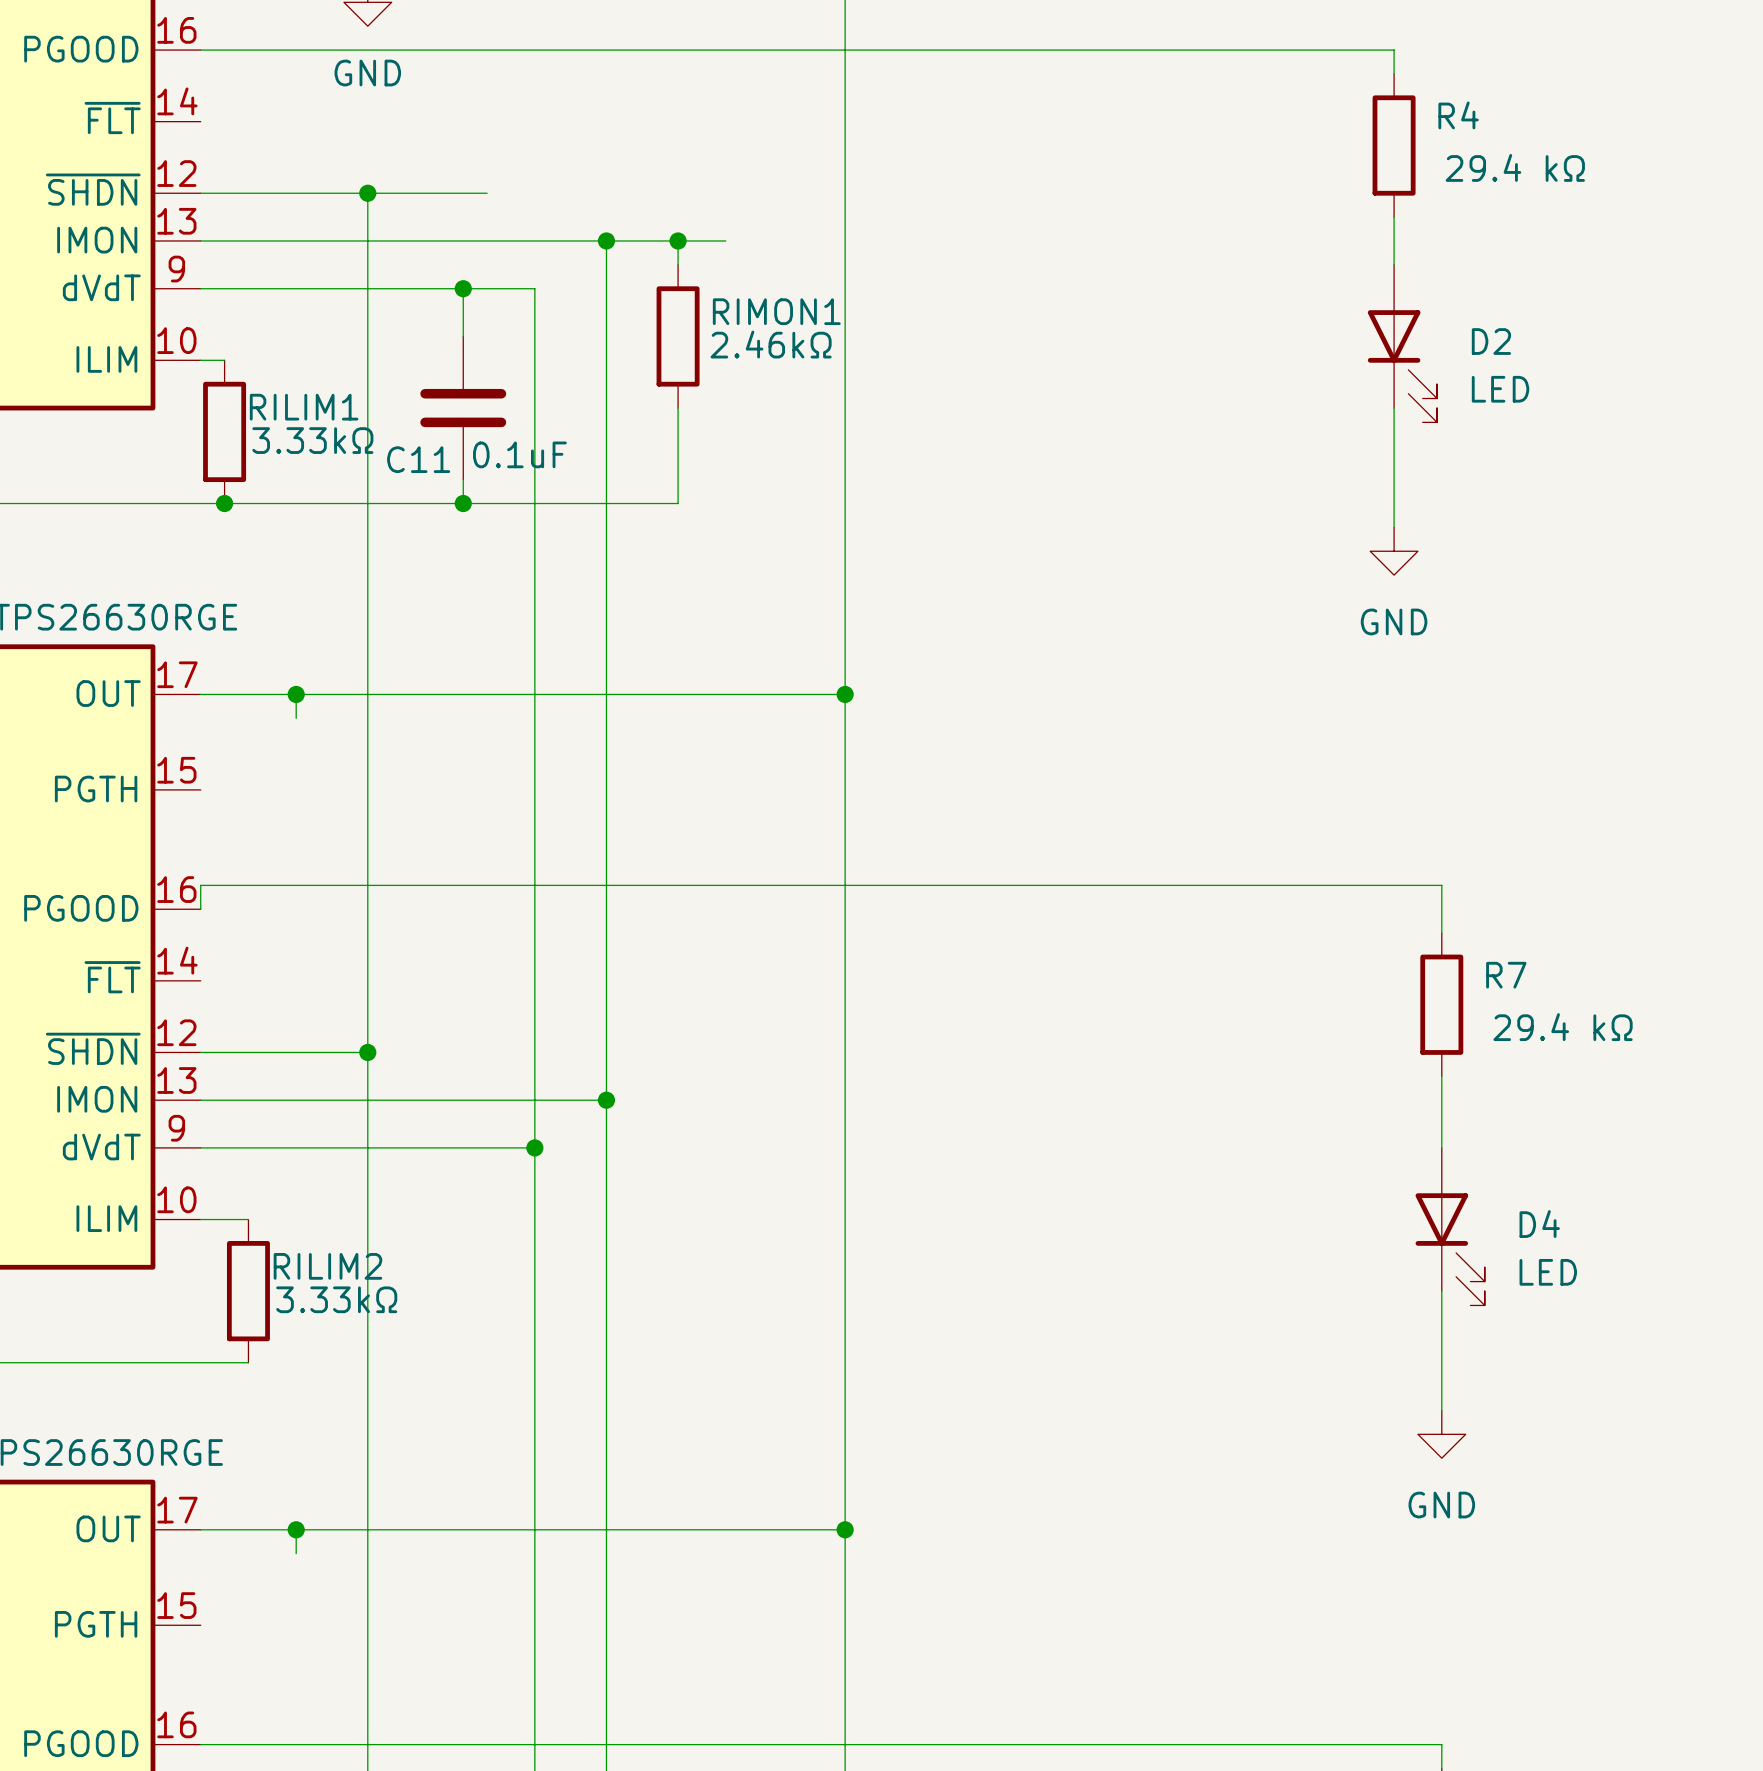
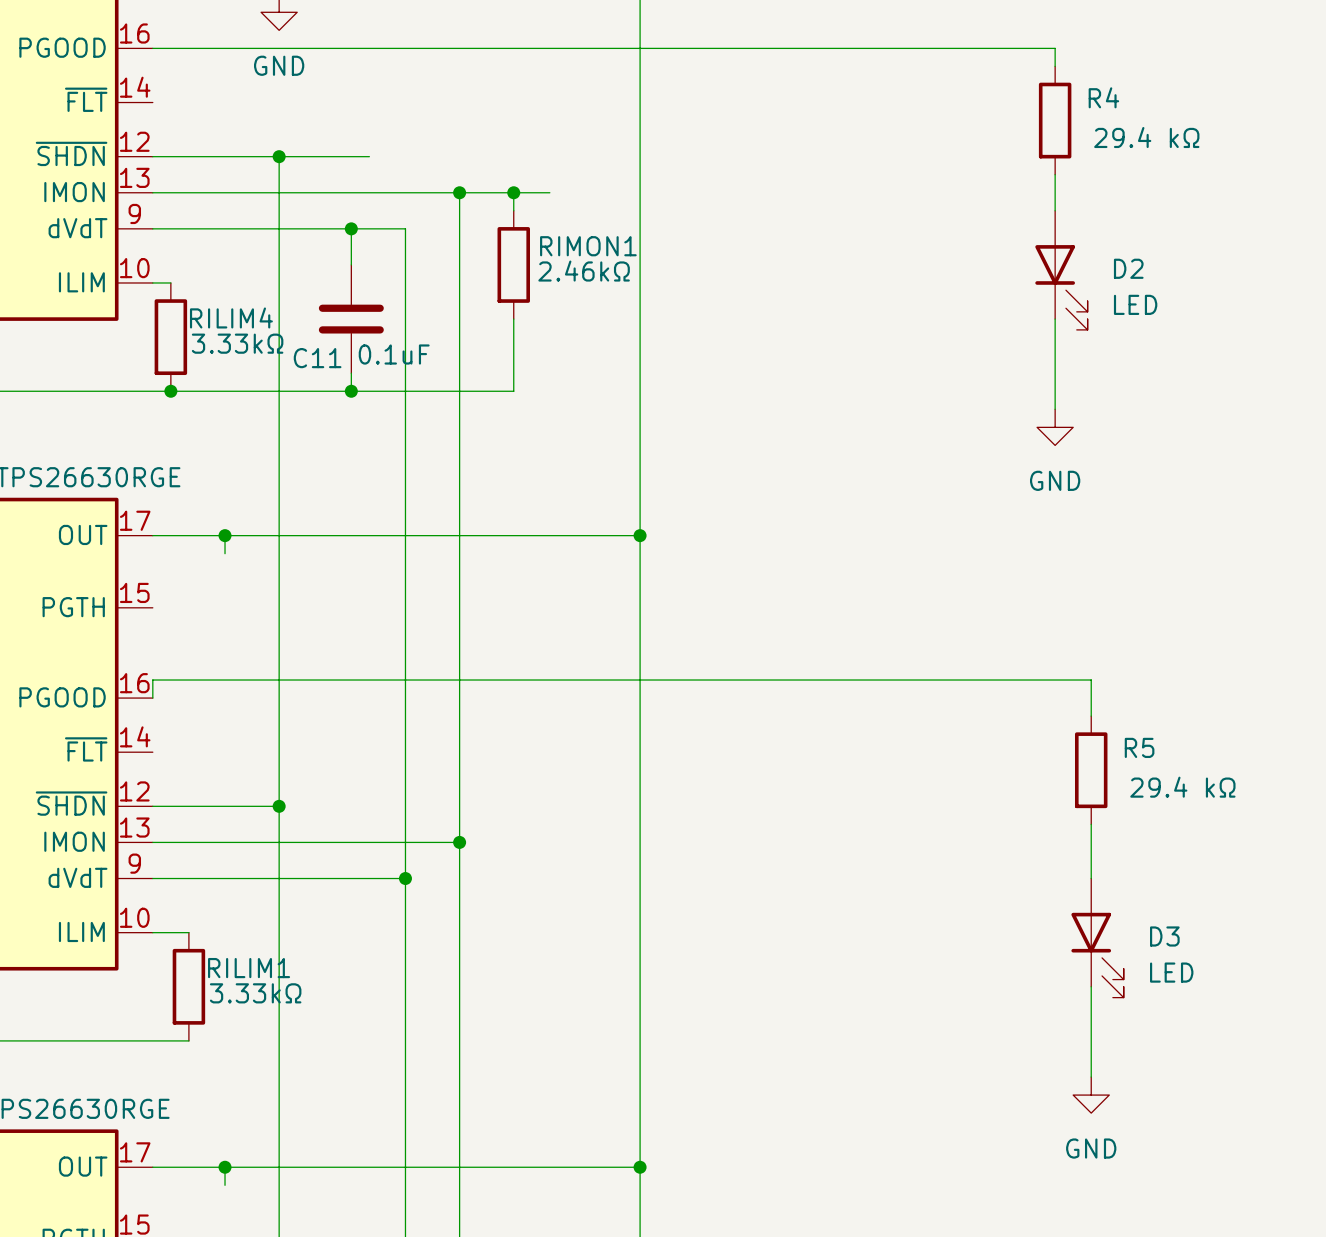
RILIM1 name: RILIM1 (304, 407) -> RILIM4 (231, 317)
R7 name: R7 (1506, 975) -> R5 (1139, 747)
D4 name: D4 (1539, 1224) -> D3 (1164, 936)
RILIM2 name: RILIM2 (327, 1266) -> RILIM1 (249, 968)

